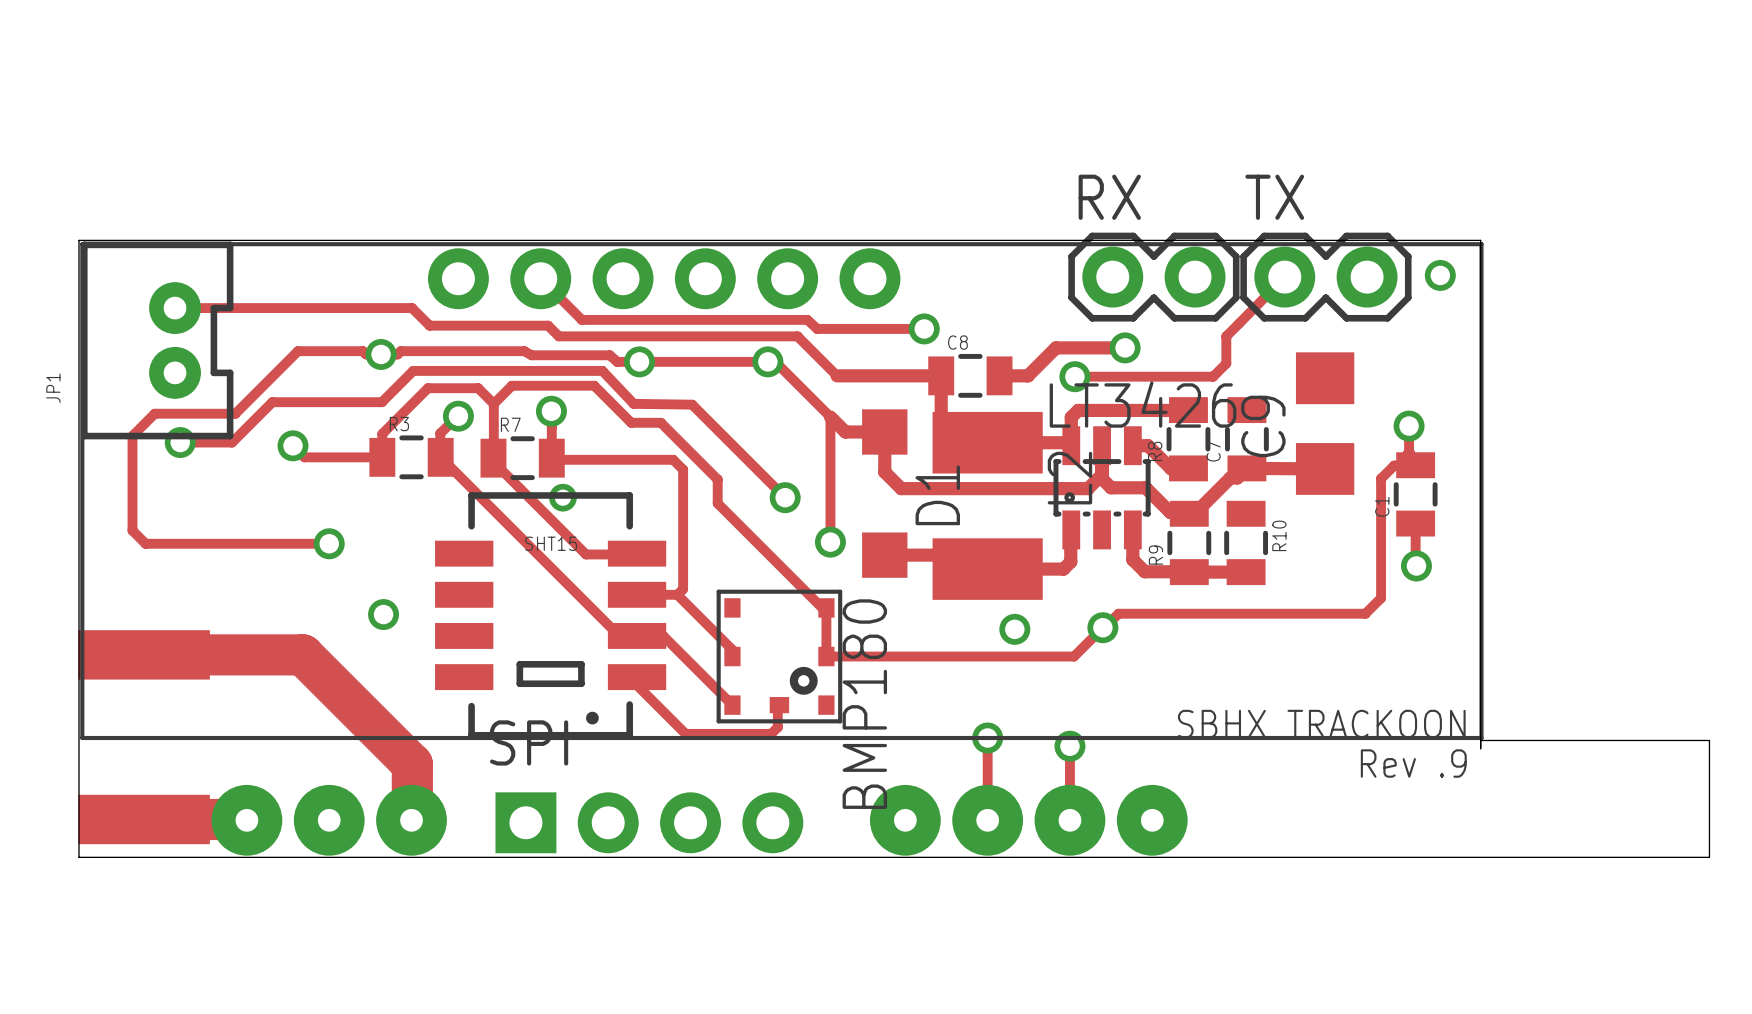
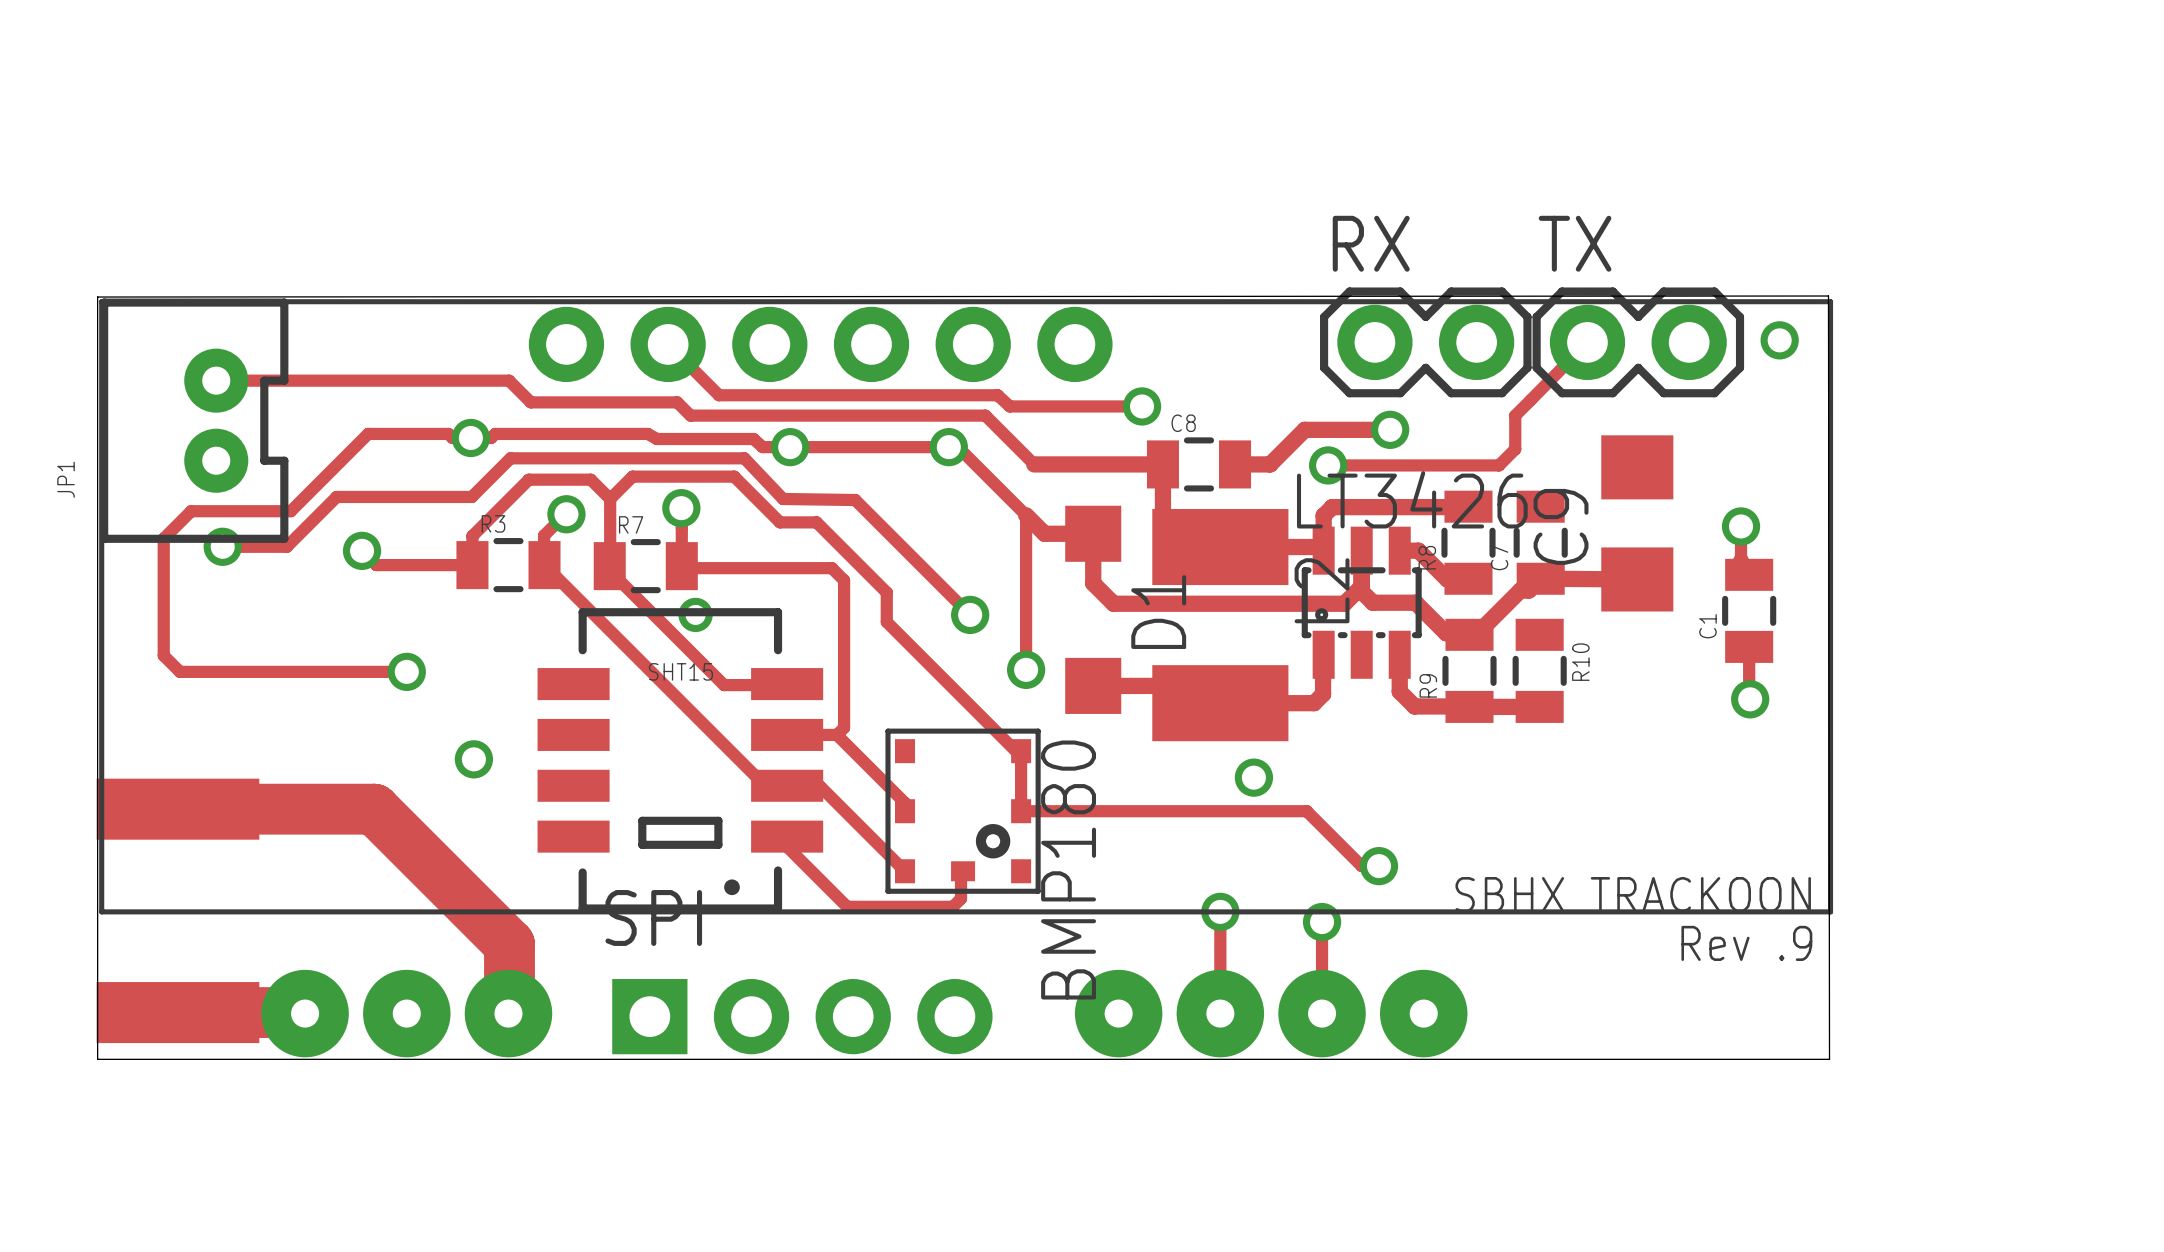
board edge: (79, 240) (1480, 240) (1480, 748) -> (97, 297) (1828, 296) (1829, 1059)
track: (1415, 465) (1394, 465) (1381, 478) (1381, 598) (1365, 613) (1118, 613) (1074, 656) (1057, 656) -> (1378, 866) (1361, 866) (1306, 811)
via position: (1102, 627) -> (1378, 866)
board edge: (1480, 740) (1709, 740) (1709, 857) (1480, 857) -> none

